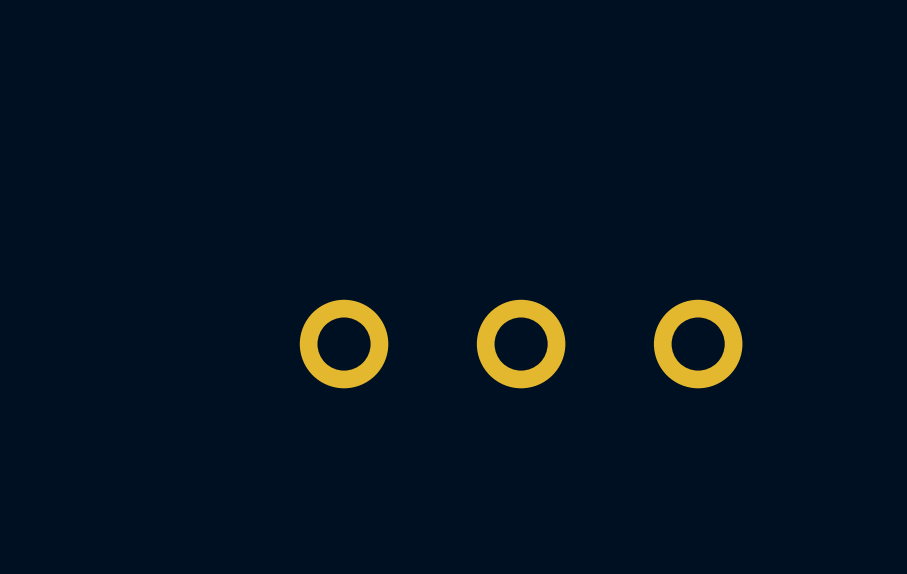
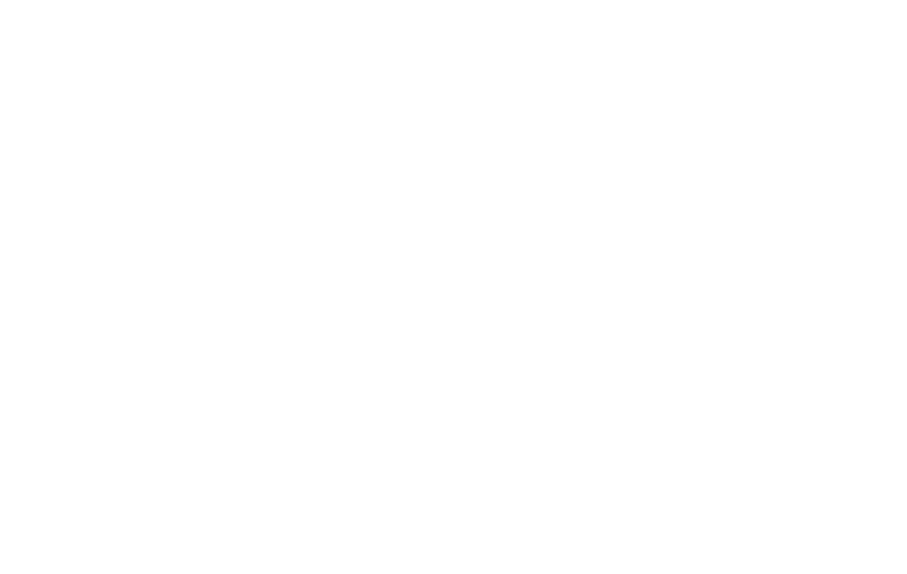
part: (521, 344) -> none

